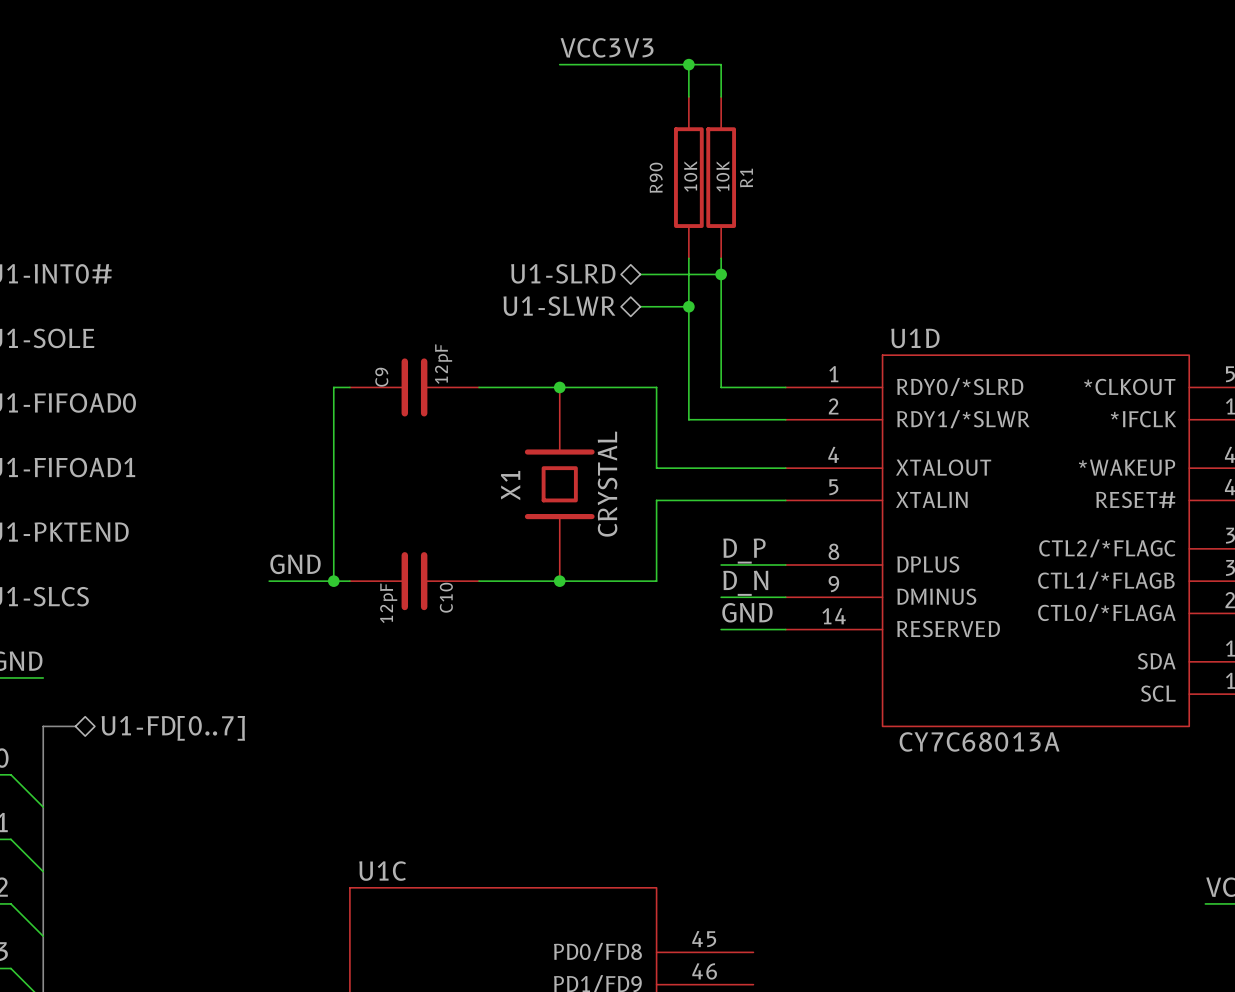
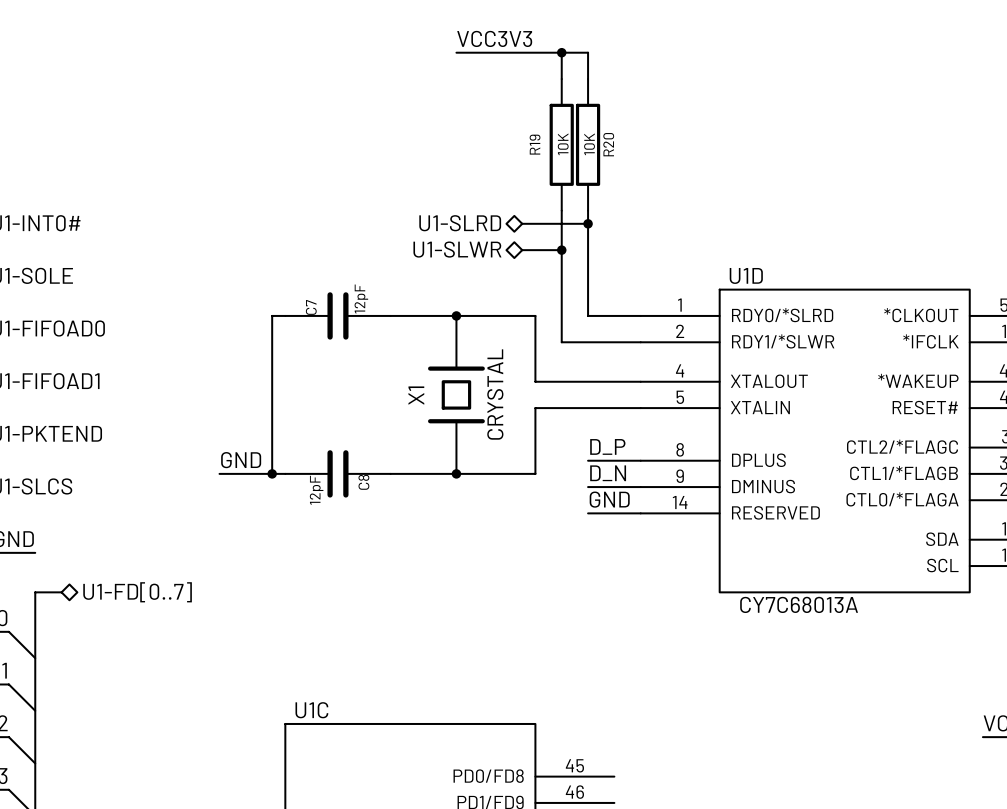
R90 name: R90 (656, 177) -> R19 (535, 144)
R1 name: R1 (746, 178) -> R20 (608, 144)
C9 name: C9 (381, 377) -> C7 (311, 307)
C10 name: C10 (446, 597) -> C8 (363, 482)

